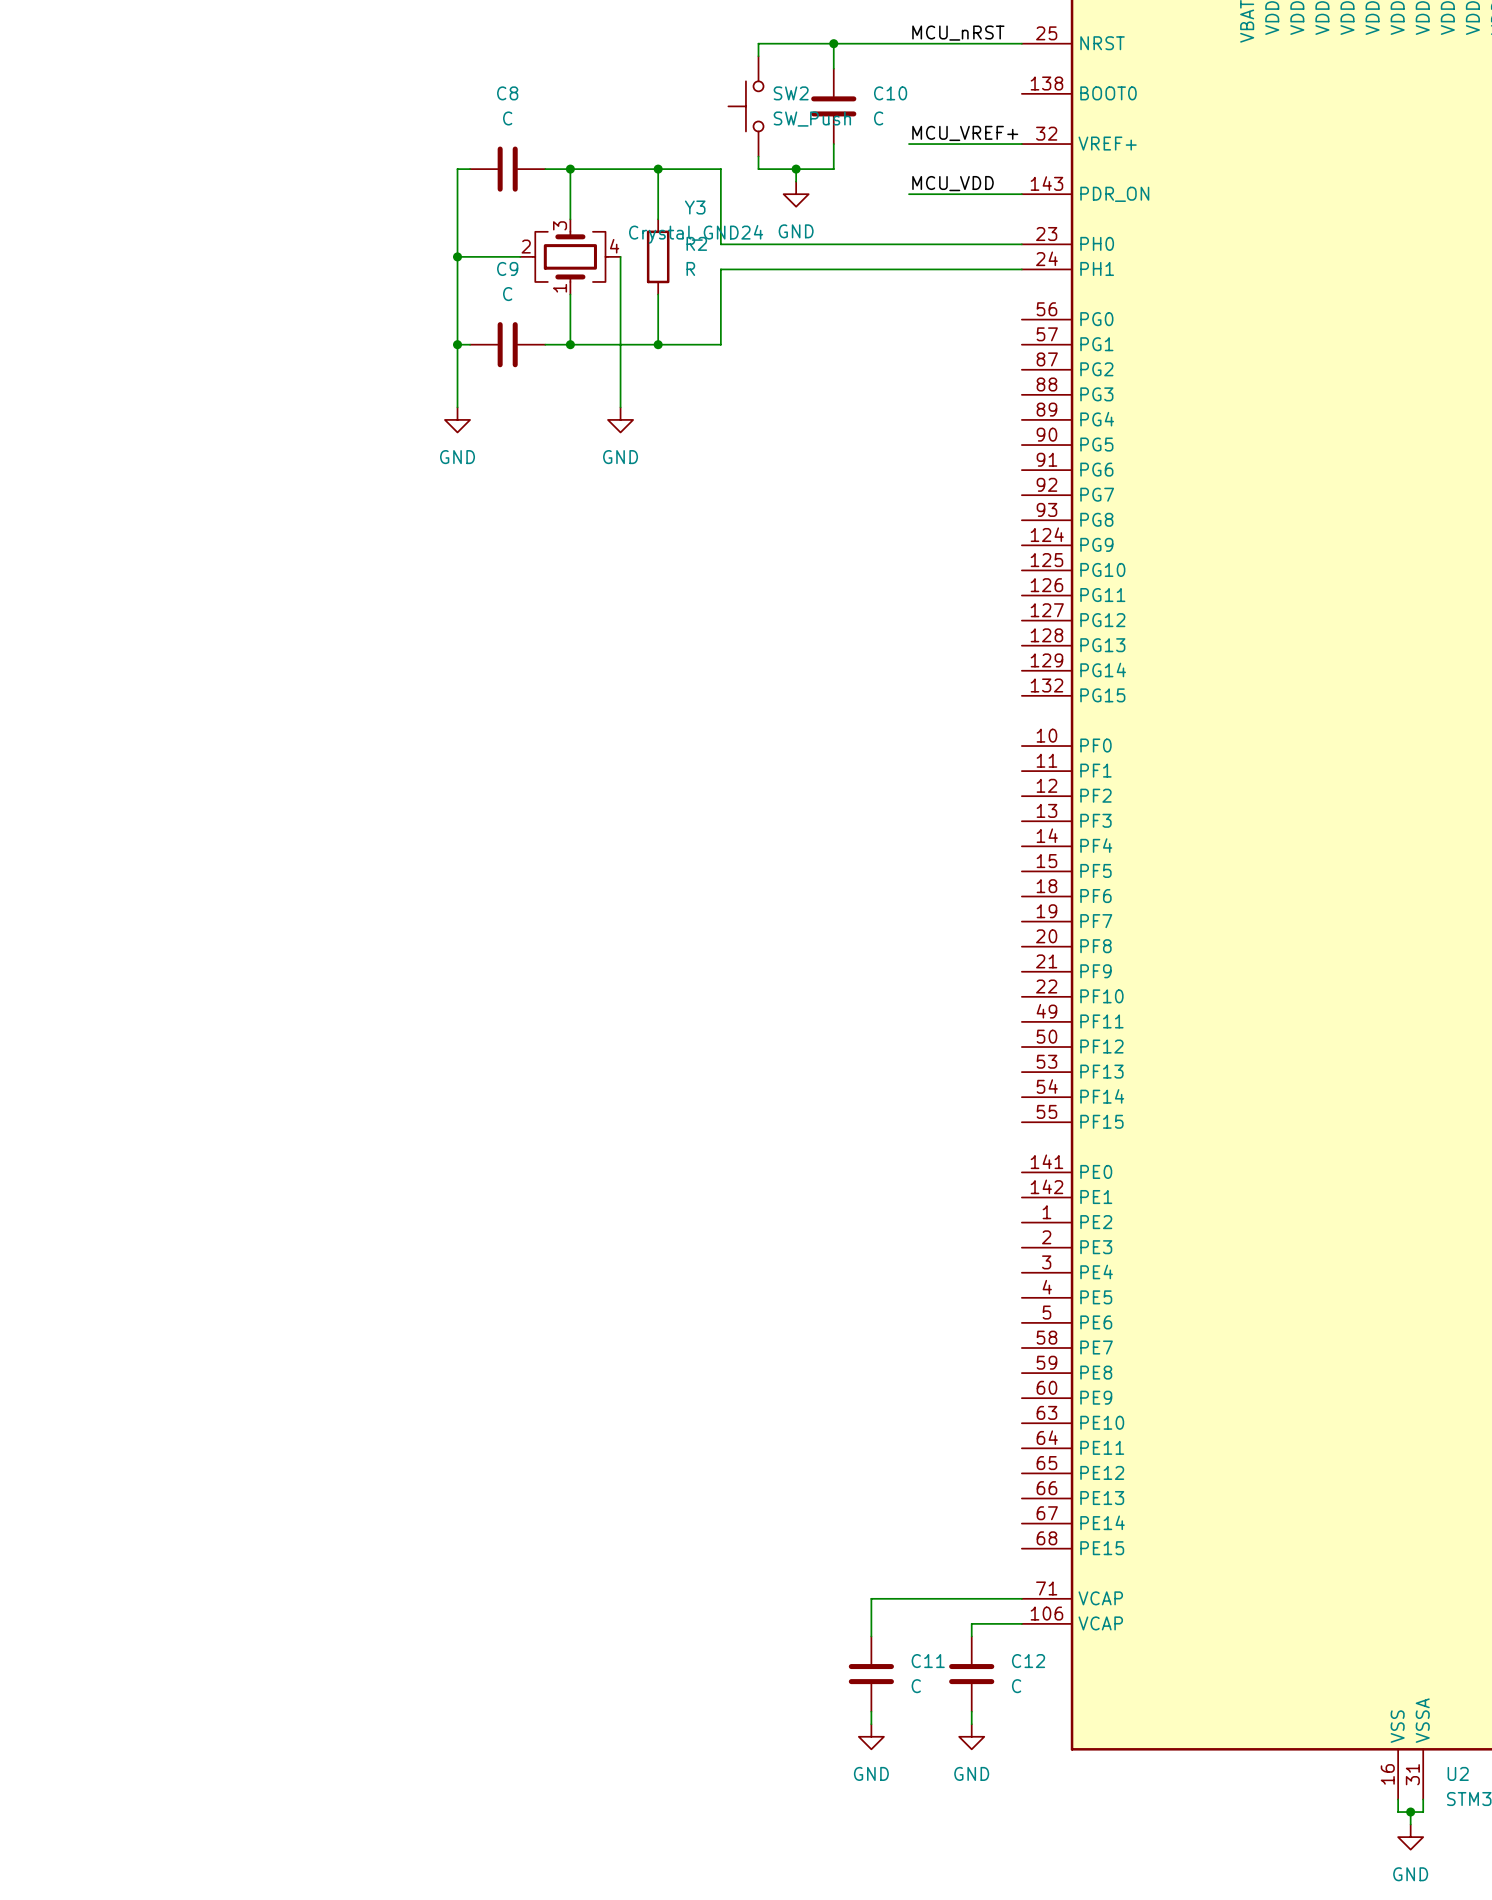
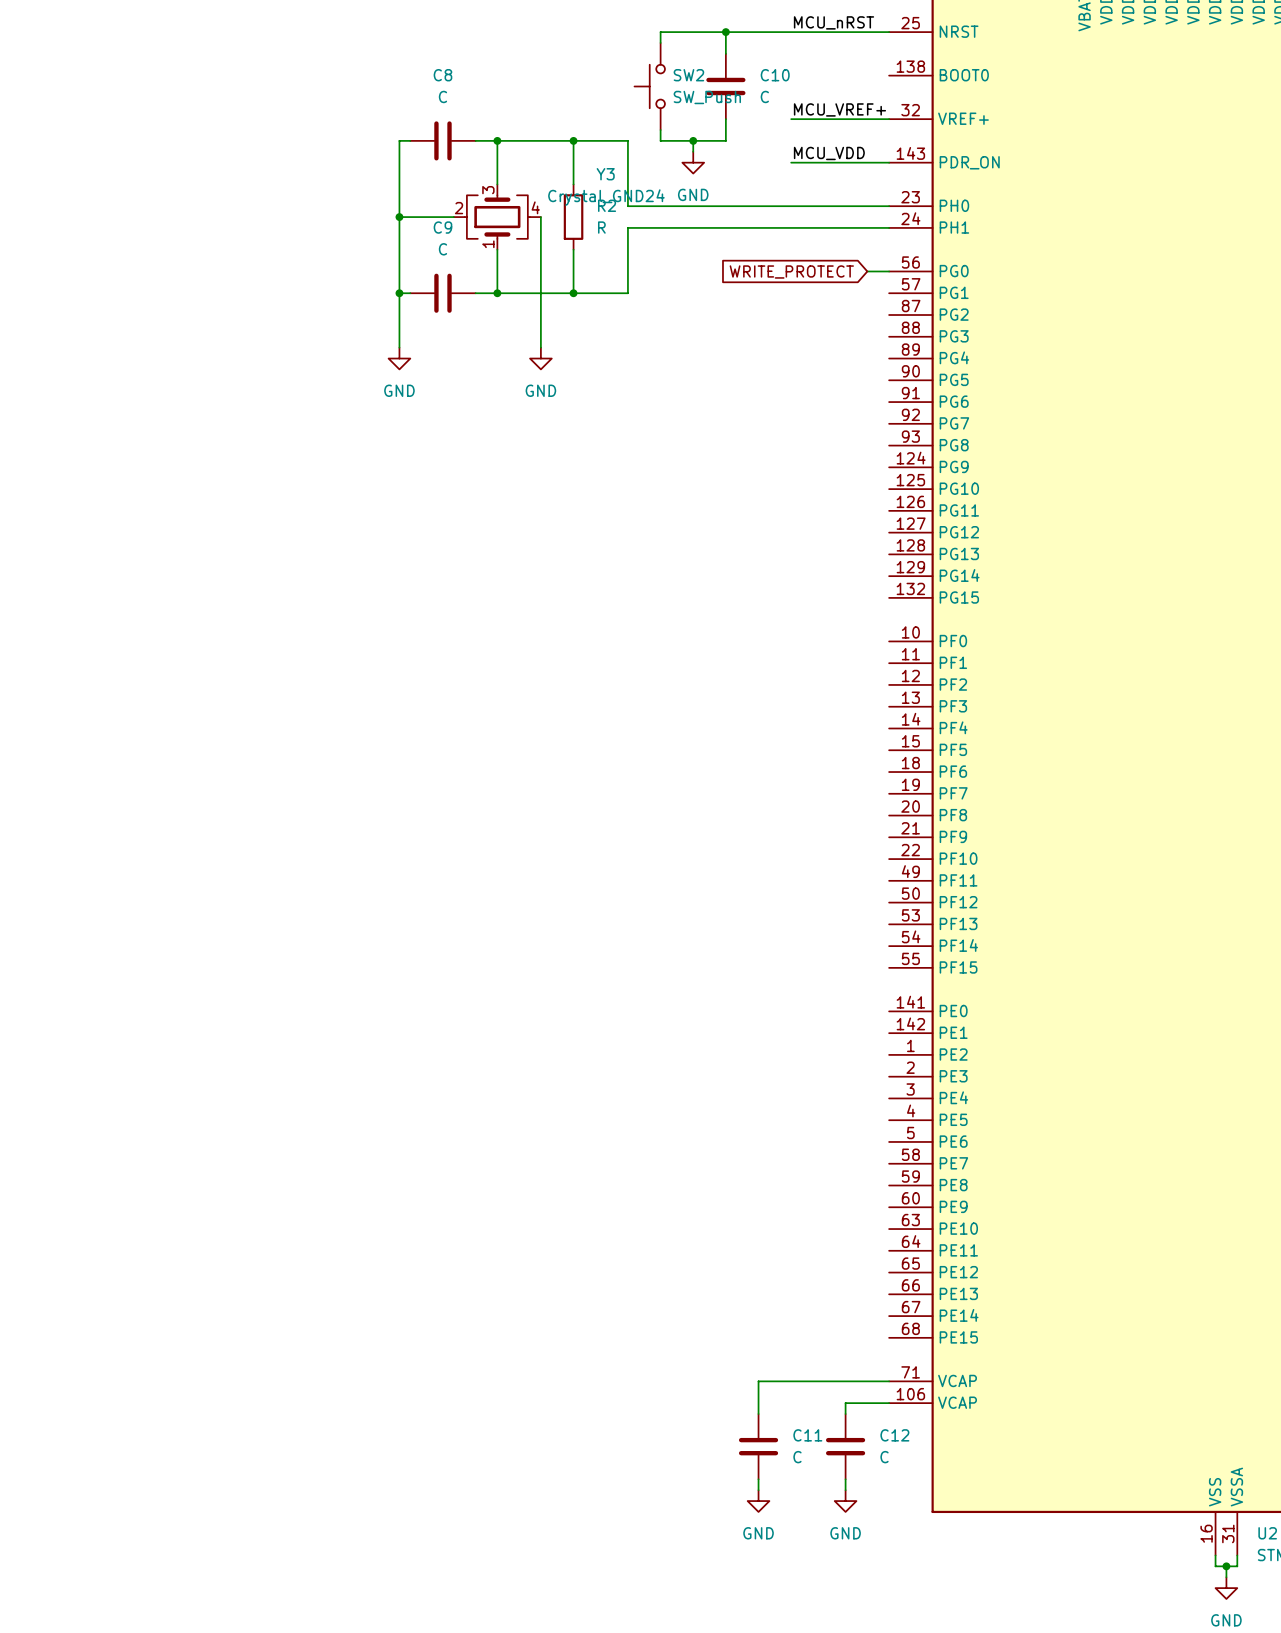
wire: none -> (867, 271) (889, 271)
global label: none -> WRITE_PROTECT (791, 272)

